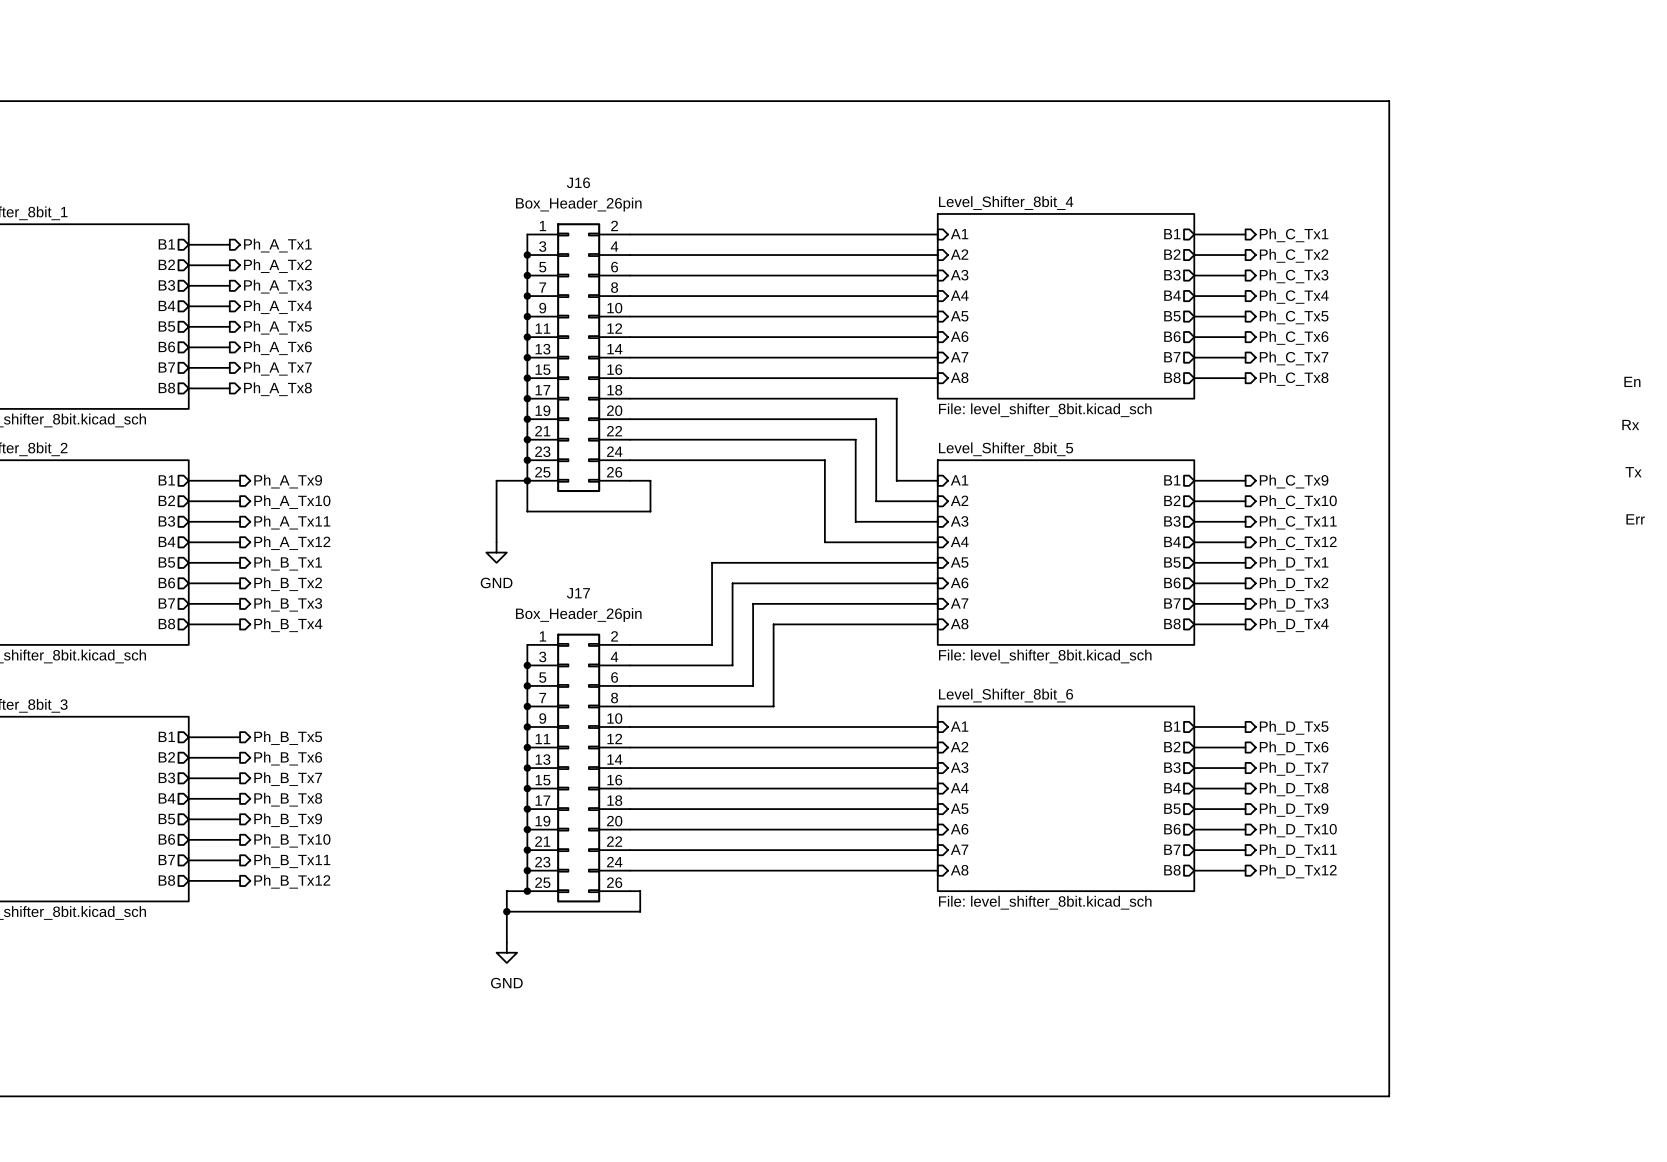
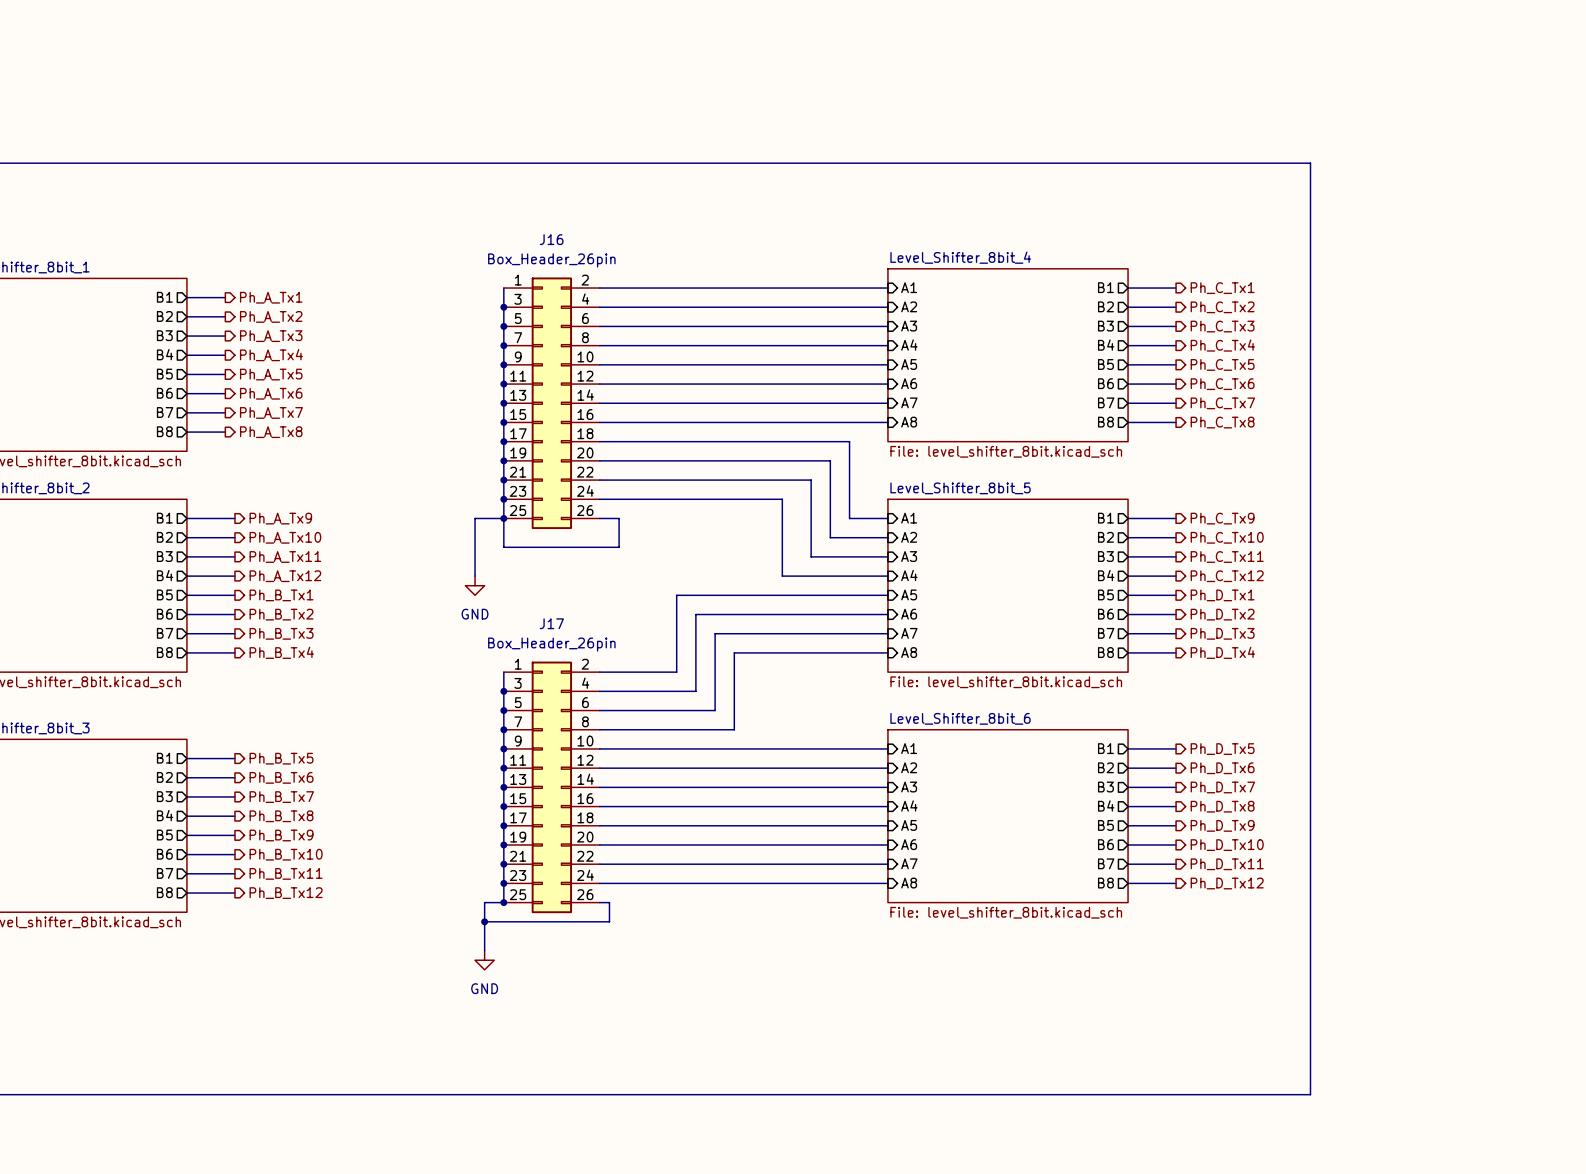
text: En (1632, 381) -> none
text: Rx (1630, 424) -> none
text: Tx (1633, 472) -> none
text: Err (1635, 519) -> none

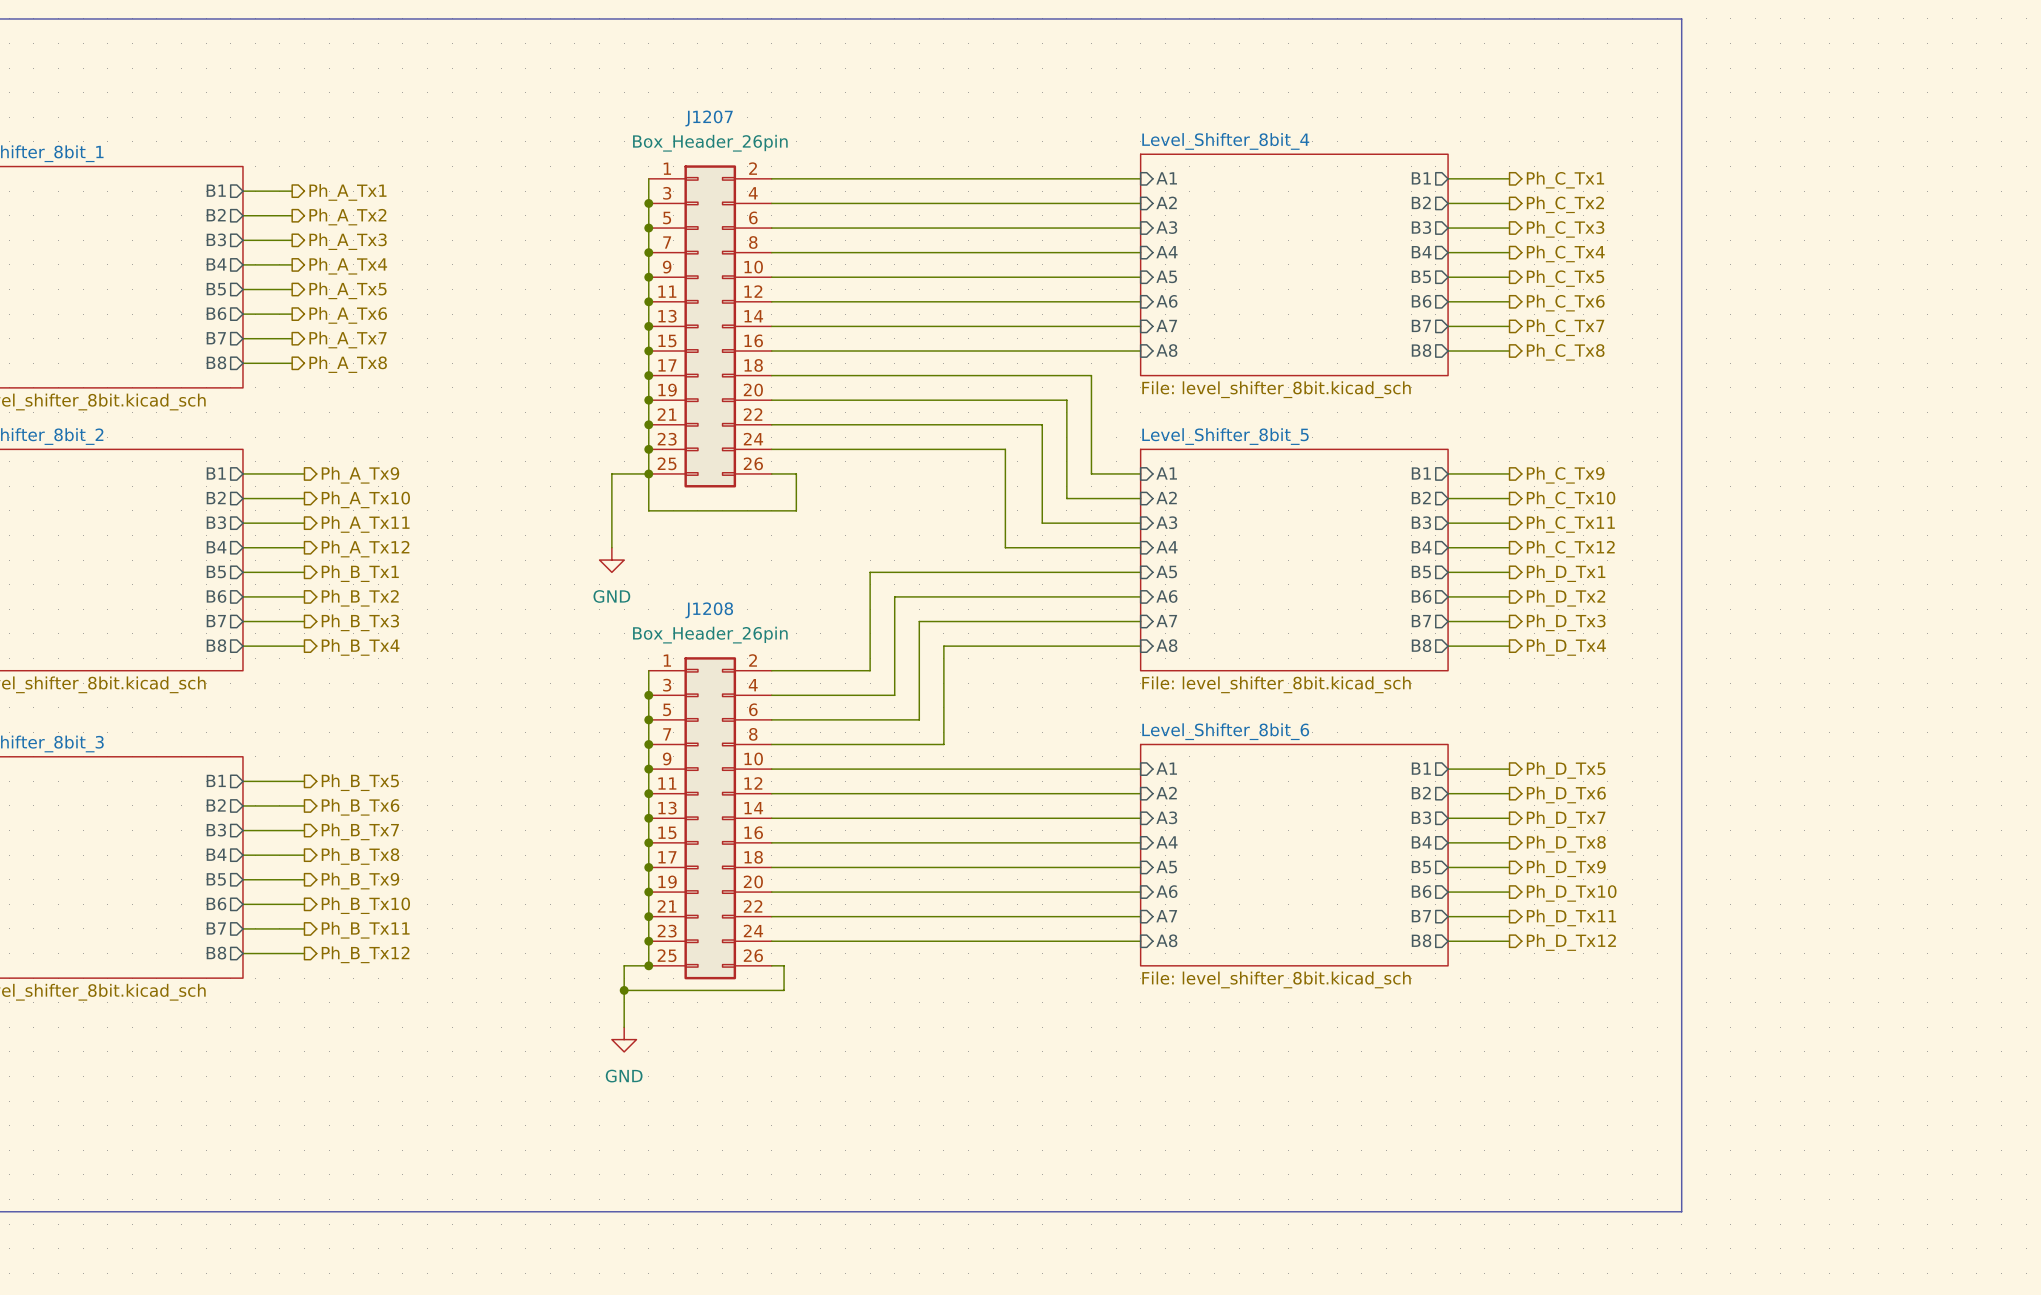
J16 name: J16 (551, 239) -> J1207 (709, 118)
J17 name: J17 (551, 623) -> J1208 (709, 610)

